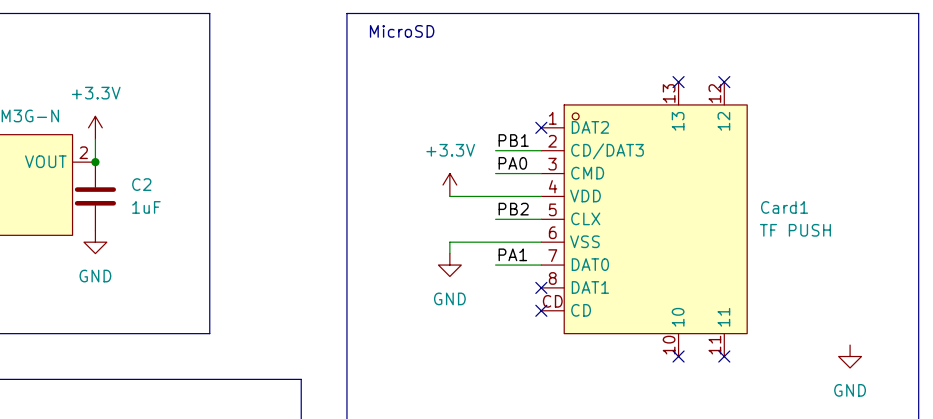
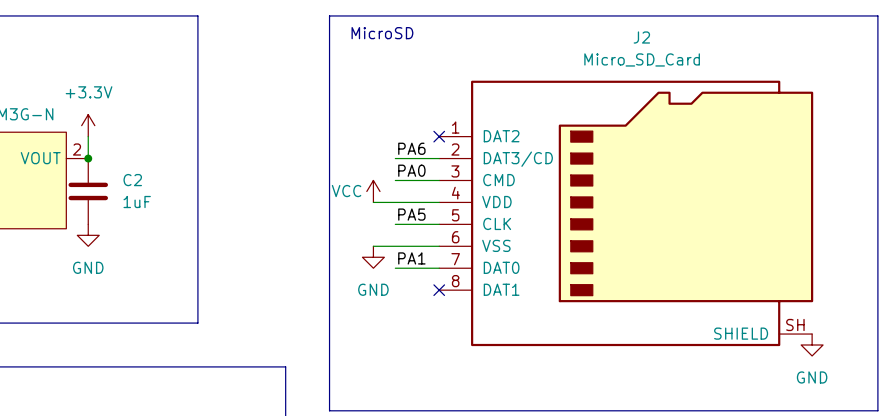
no-connect mark: (678, 82) -> none
no-connect mark: (724, 82) -> none
no-connect mark: (541, 127) -> none
no-connect mark: none -> (439, 136)
label: PB1 (513, 140) -> none
wire: (495, 150) (541, 150) -> (395, 158) (439, 158)
label: none -> PA6 (411, 148)
label position: PA0 (512, 163) -> PA0 (411, 170)
wire: (495, 173) (541, 173) -> (395, 180) (439, 180)
power symbol: +3.3V (449, 185) -> none
power symbol: none -> VCC (373, 191)
wire: (449, 196) (541, 196) -> none
wire: none -> (373, 202) (439, 202)
label: PB2 (513, 209) -> none
wire: (495, 219) (541, 219) -> (395, 224) (439, 224)
Card1: TF PUSH (644, 219) -> none
J2: none -> Micro_SD_Card (626, 213)
label: none -> PA5 (411, 214)
wire: (541, 242) (449, 242) (449, 253) -> none
wire: none -> (373, 246) (439, 246)
label position: PA1 (512, 254) -> PA1 (411, 258)
power symbol position: GND (449, 265) -> GND (373, 257)
wire: (495, 265) (541, 265) -> (395, 268) (439, 268)
no-connect mark: (541, 287) -> none
no-connect mark: none -> (439, 290)
no-connect mark: (541, 310) -> none
no-connect mark: (678, 356) -> none
no-connect mark: (724, 356) -> none

